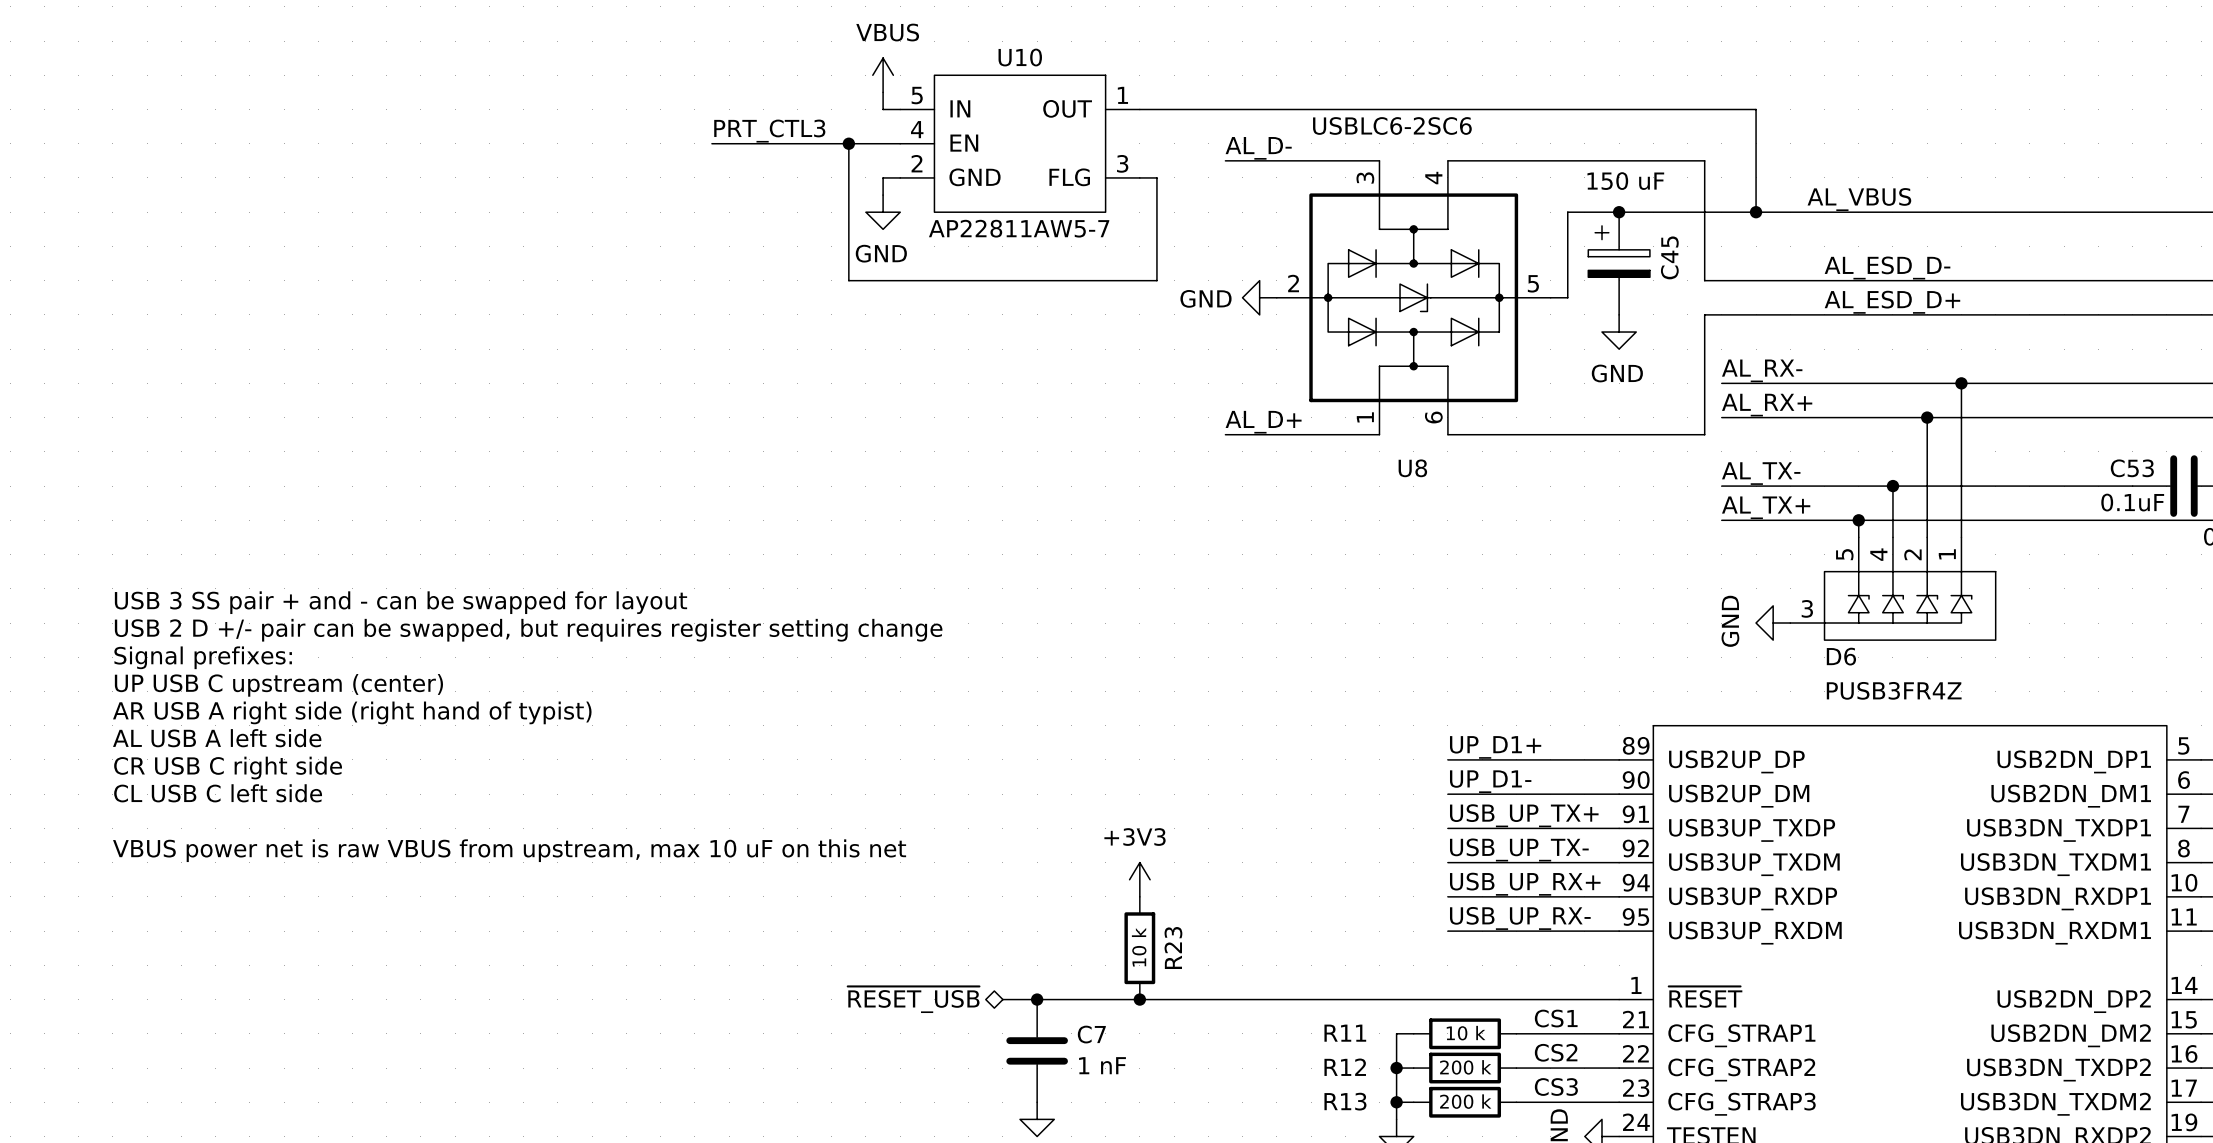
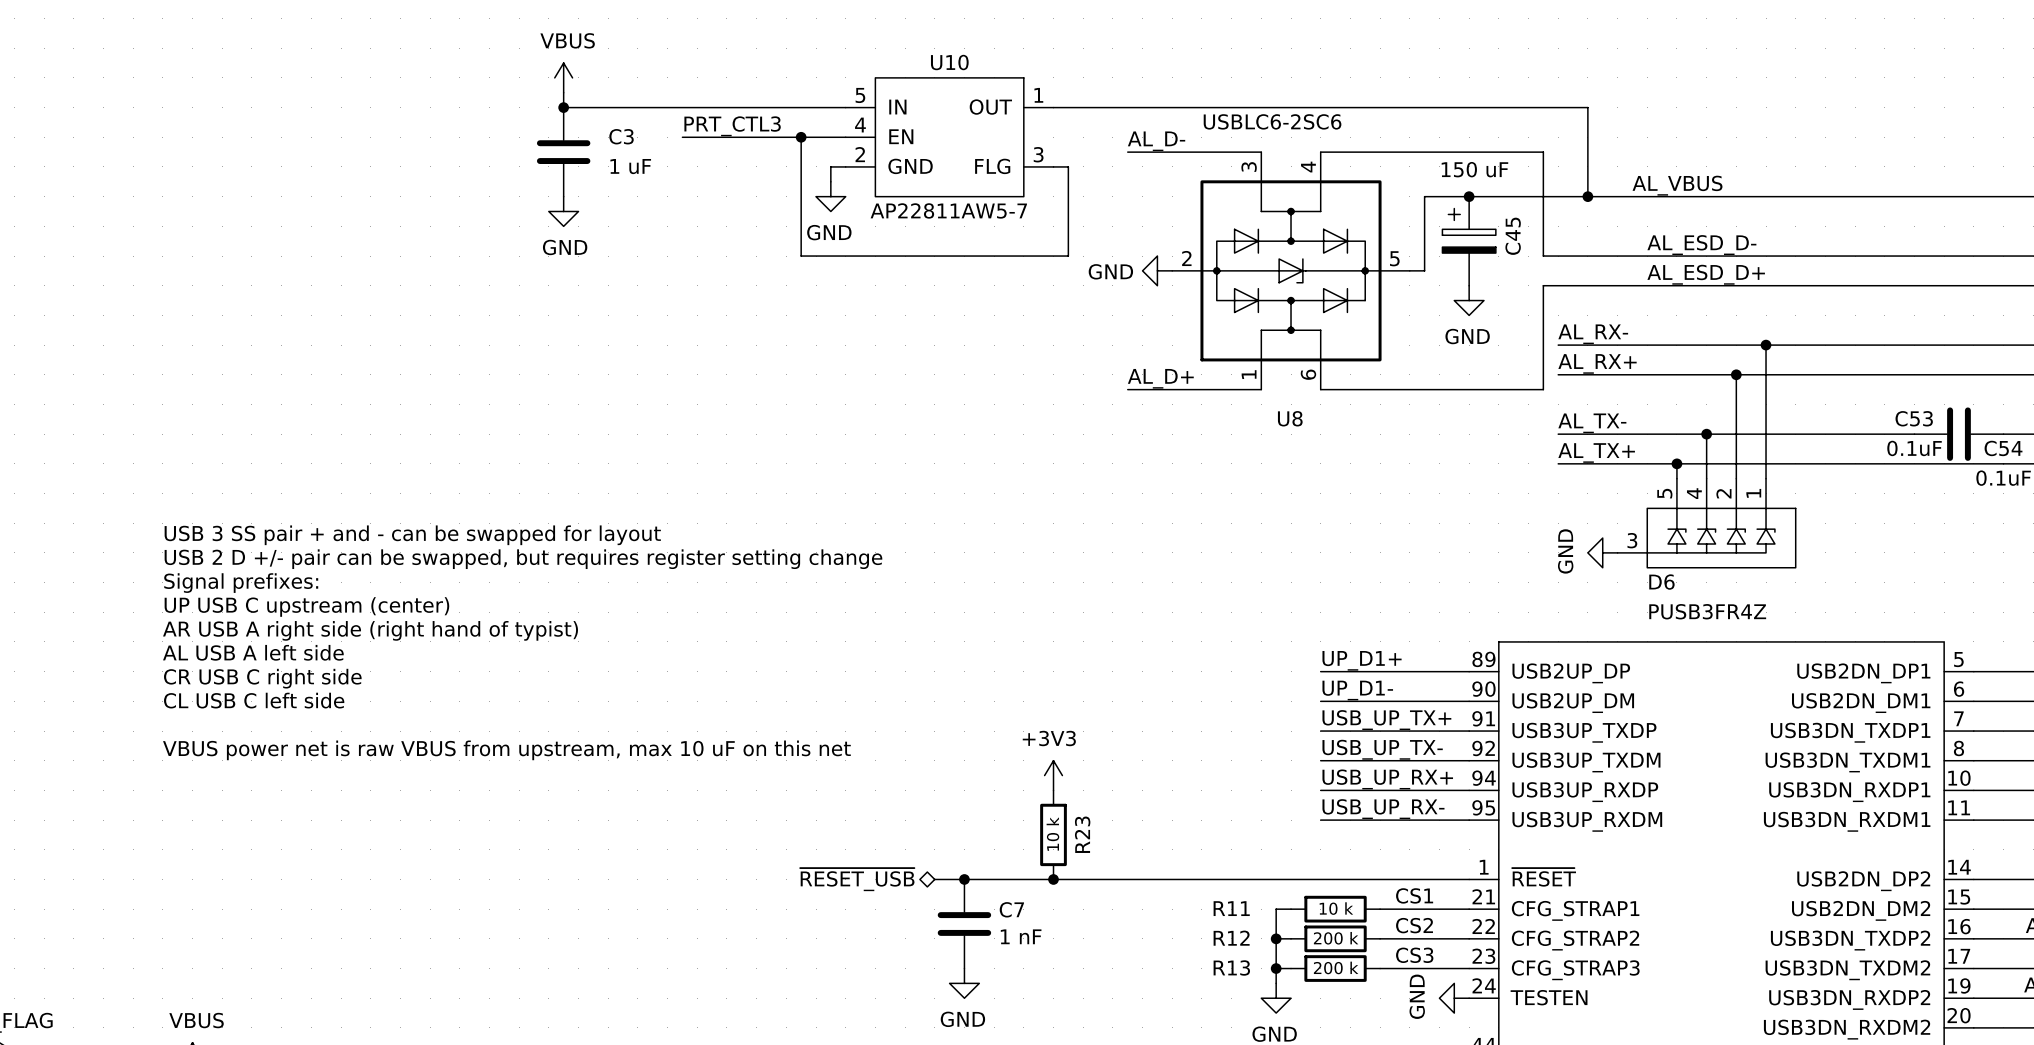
power symbol position: VBUS (883, 75) -> VBUS (563, 77)
wire: (883, 92) (883, 109) -> (563, 92) (563, 107) (830, 107)
junction: none -> (563, 107)
C3: none -> 1 uF (563, 152)
power symbol: none -> GND (563, 211)

